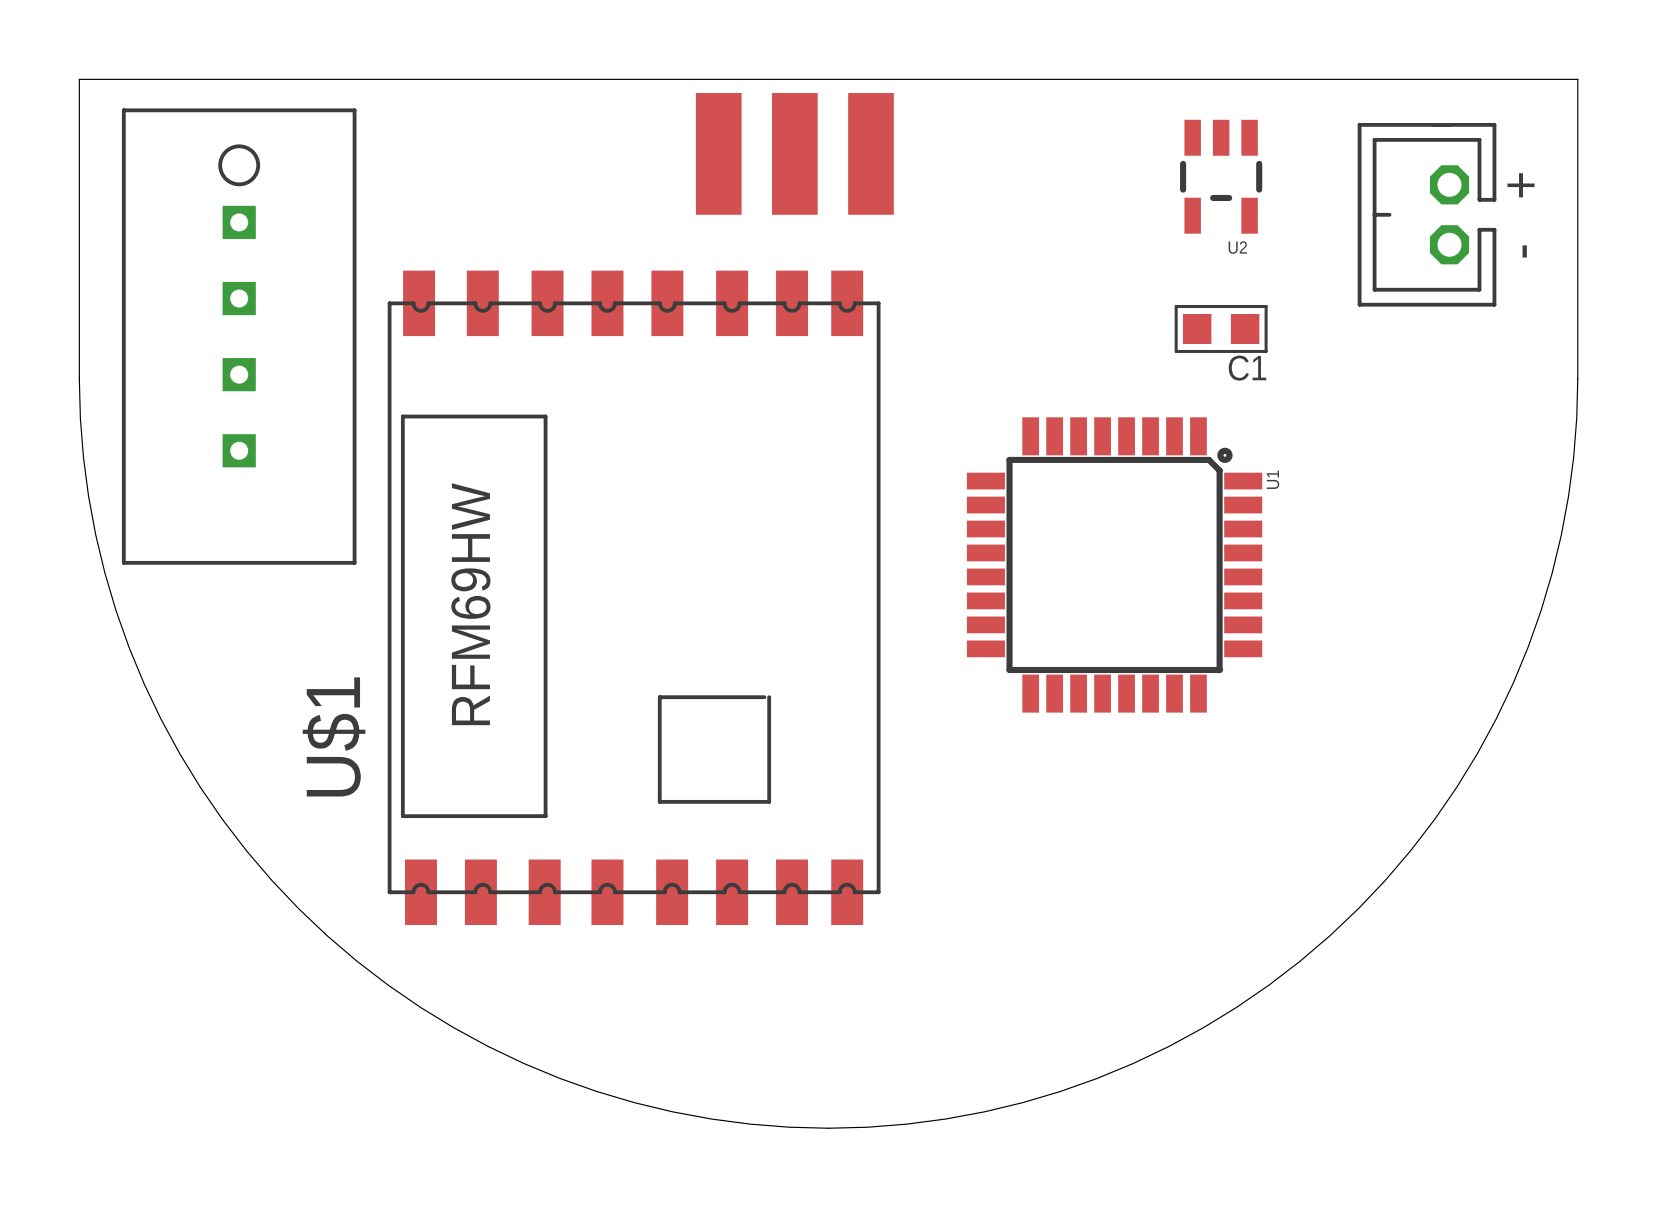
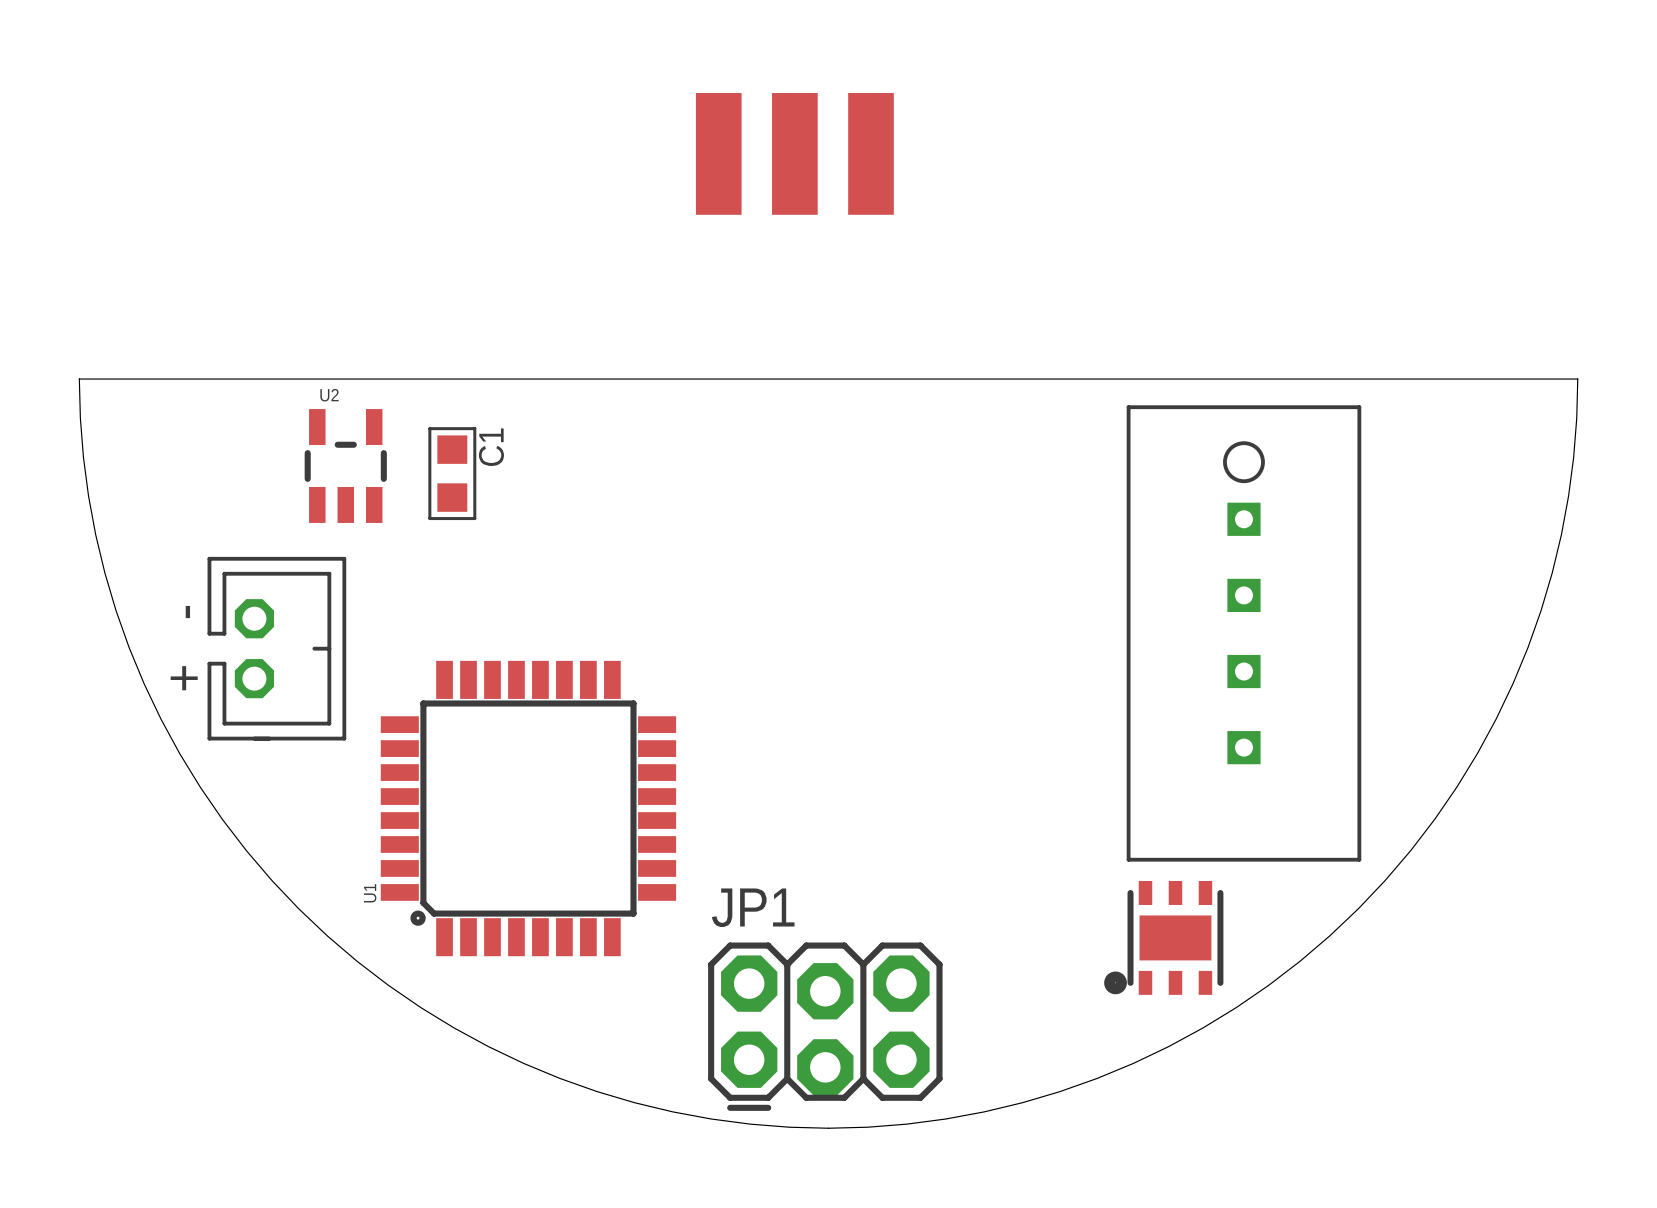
U2 rotation: 0° (1221, 176) -> 180° (345, 465)
U2 position: (1221, 176) -> (345, 465)
part: (1427, 214) -> none
C1 rotation: 0° (1221, 328) -> 90° clockwise (452, 473)
C1 position: (1221, 328) -> (452, 473)
part: (239, 336) -> none
C1 name position: C1 (1247, 368) -> C1 (491, 447)
board edge: (79, 379) (79, 79) (1577, 79) (1577, 379) -> (79, 379) (1577, 379)
U1 rotation: 0° (1114, 564) -> 180° (528, 808)
U1 position: (1114, 564) -> (528, 808)
U$1: (634, 597) -> none
part: none -> (1243, 633)
part: none -> (276, 648)
part: none -> (1163, 937)
JP1: none -> (825, 1026)

